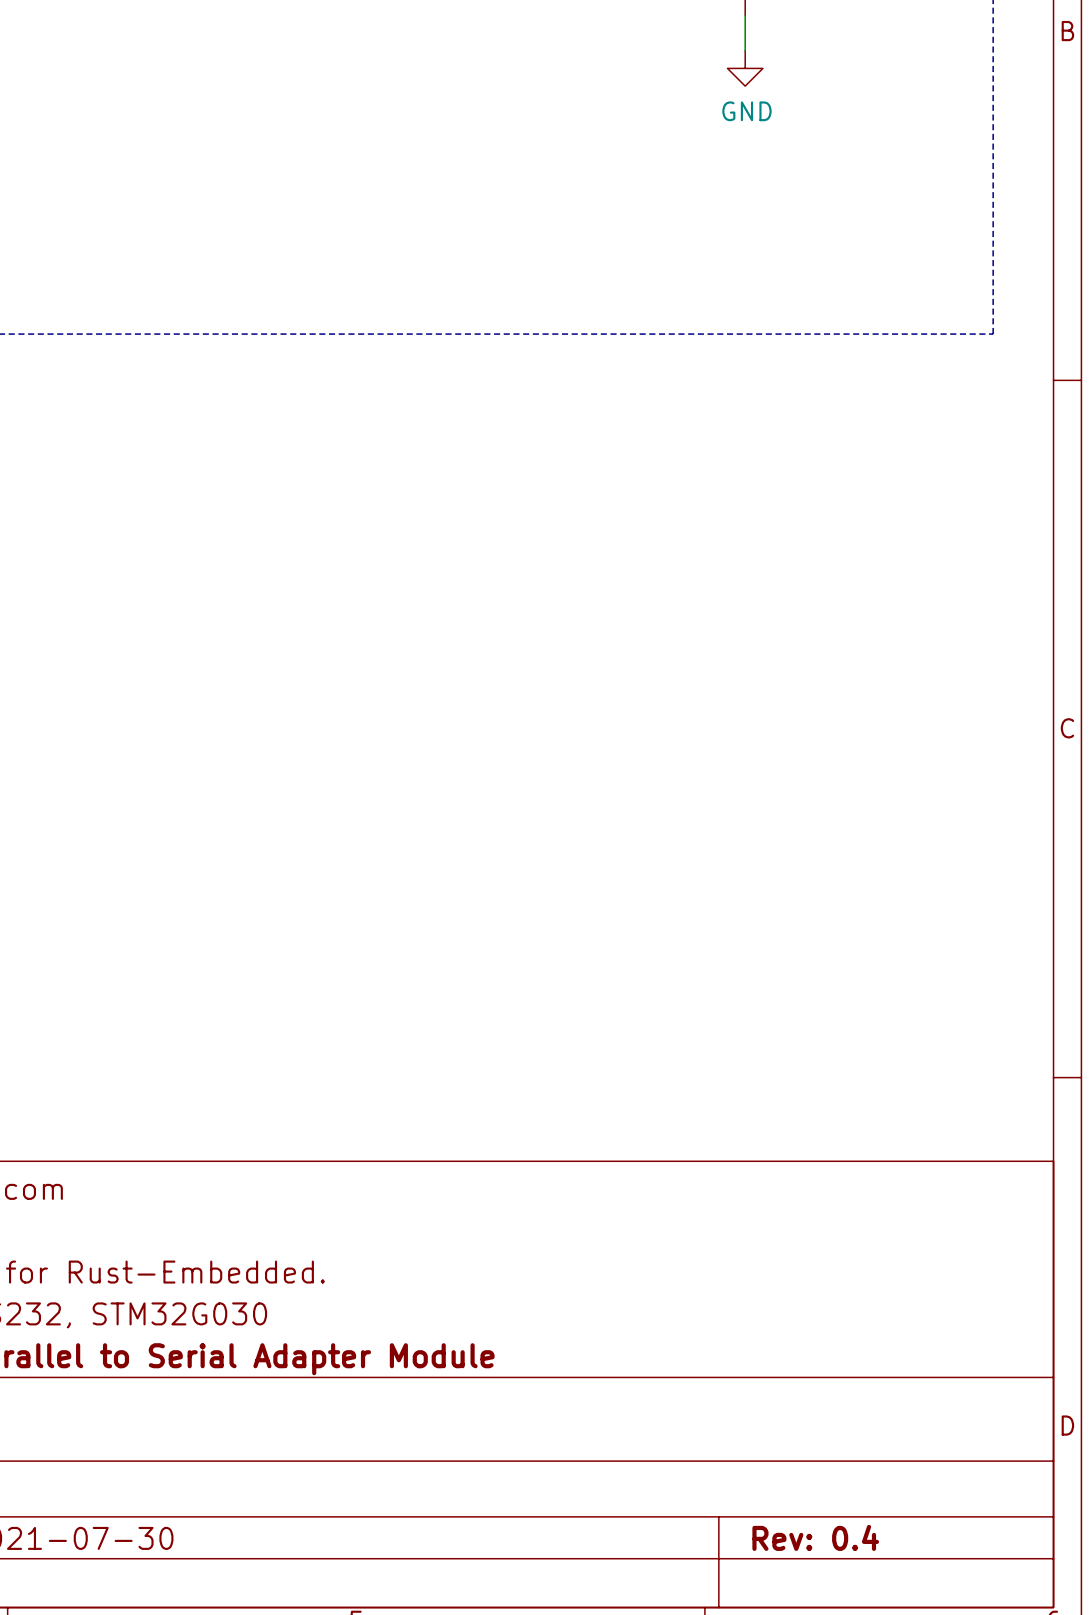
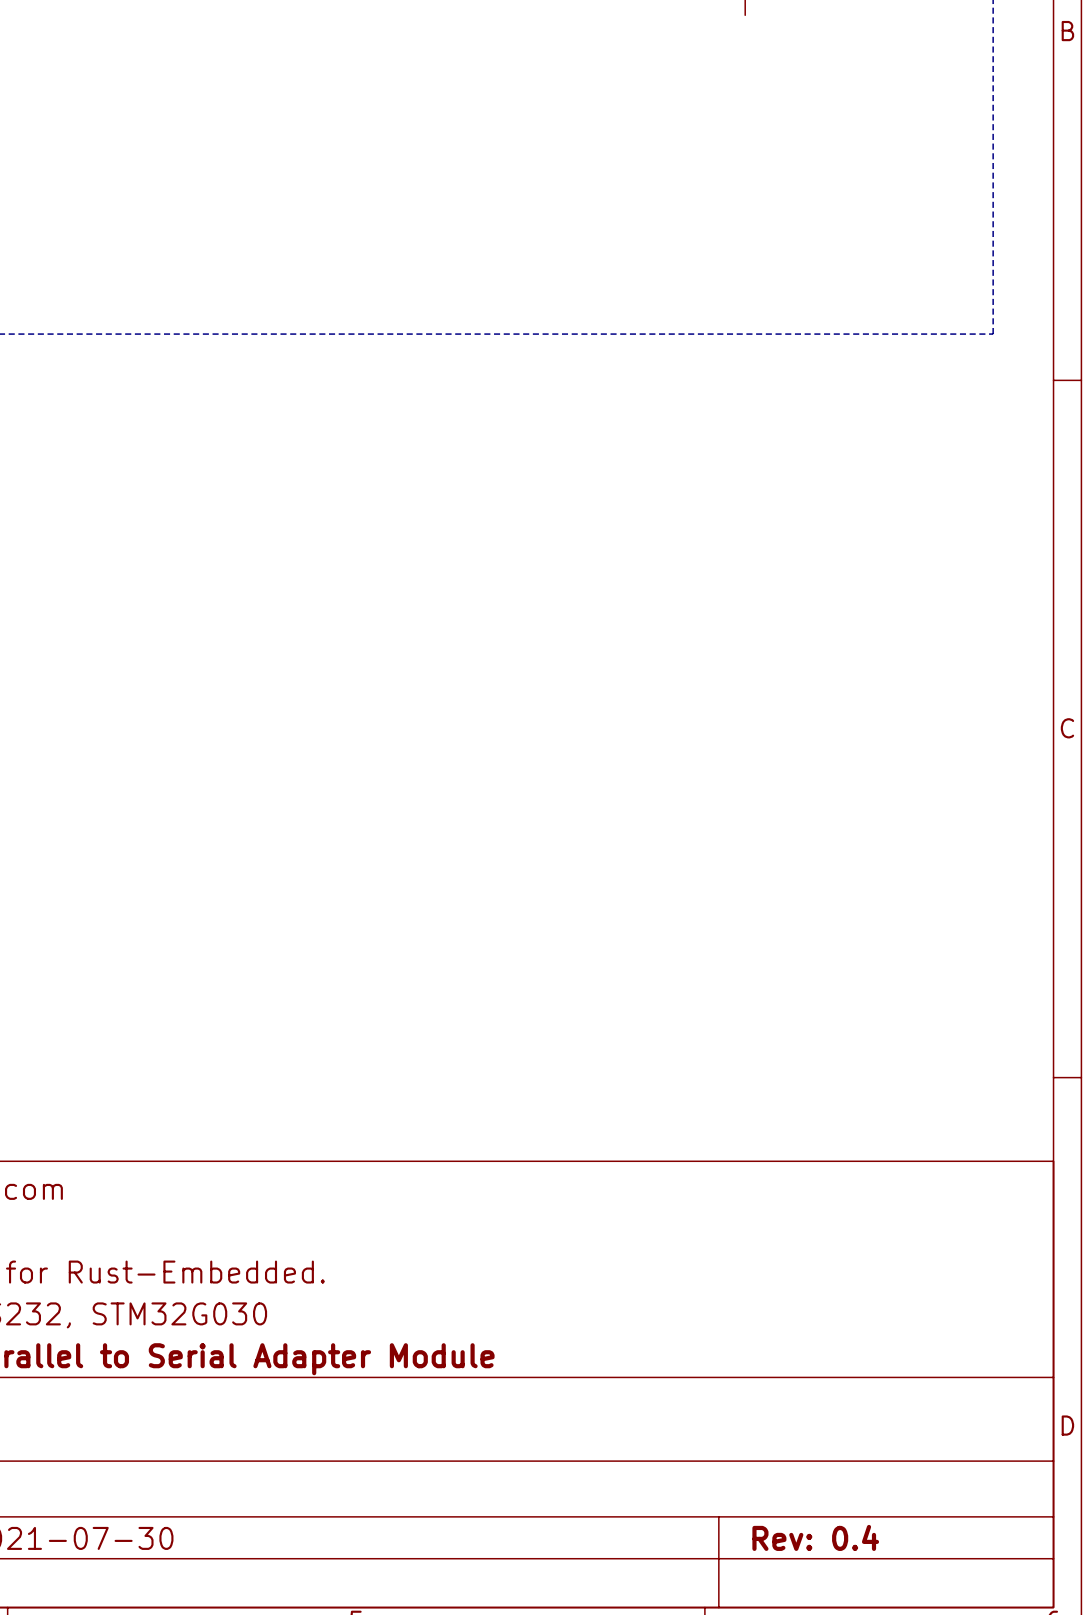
wire: (745, 15) (745, 50) -> none
power symbol: GND (745, 68) -> none

